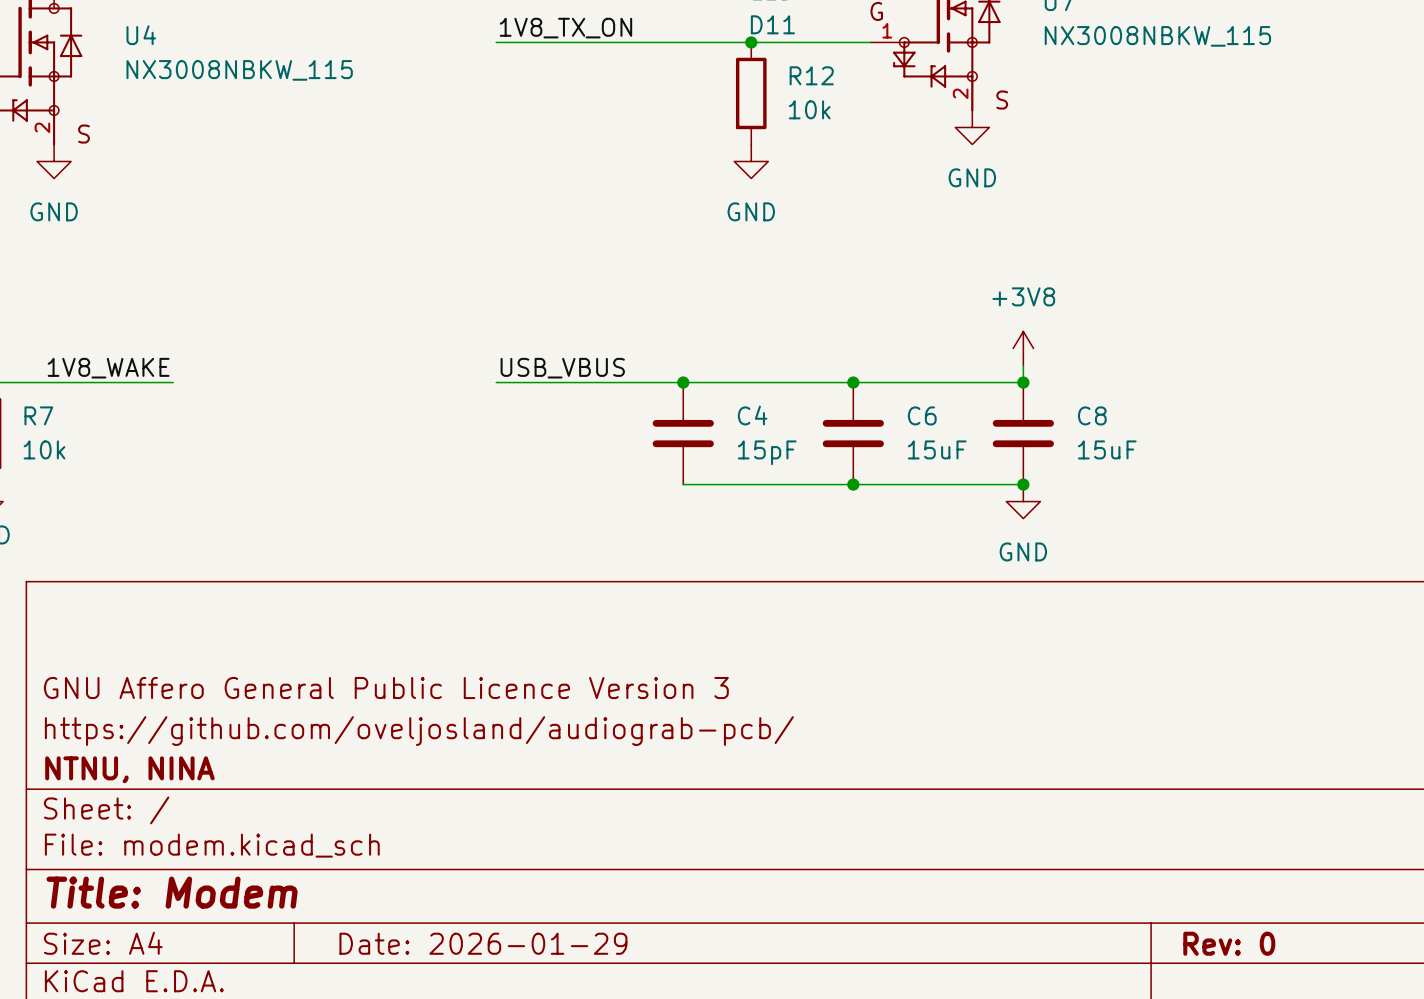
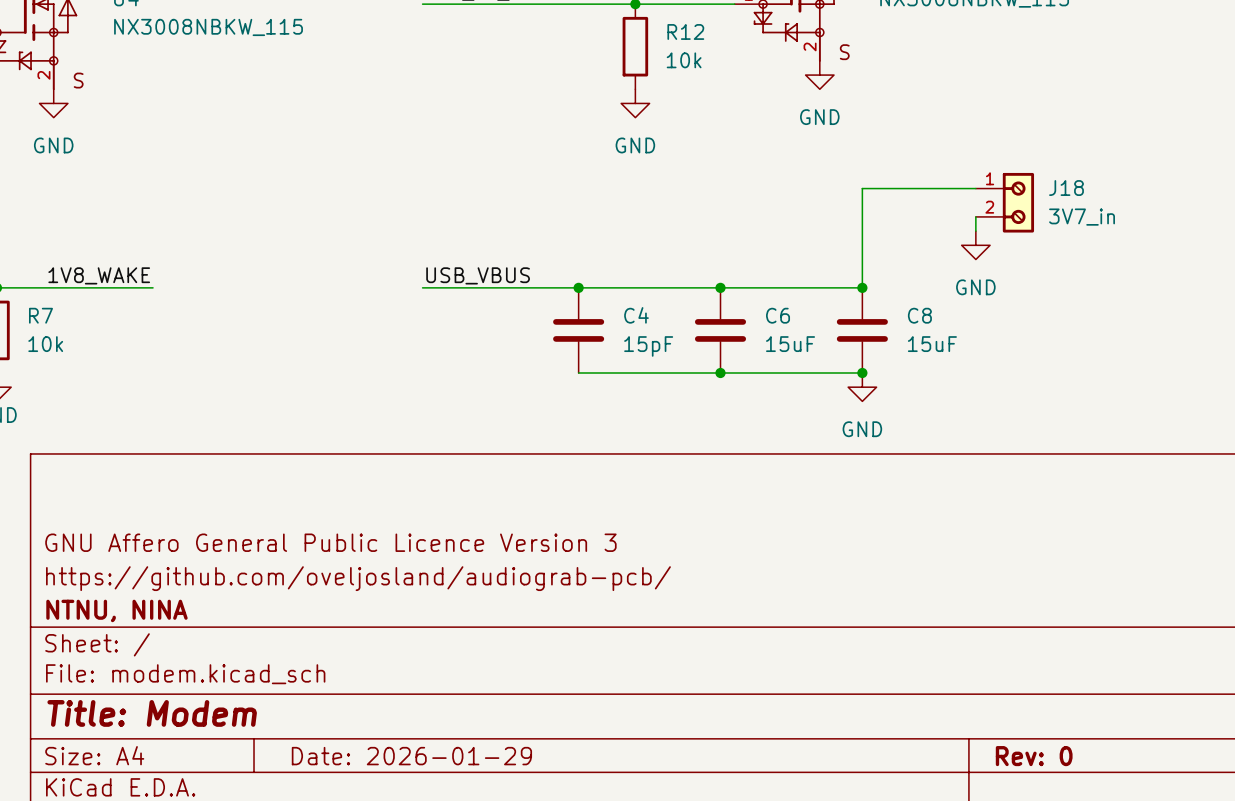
wire: none -> (975, 188) (862, 188) (862, 273)
J18: none -> 3V7_in (1004, 202)
wire: none -> (975, 216) (975, 231)
power symbol: none -> GND (975, 245)
power symbol: +3V8 (1023, 348) -> none

